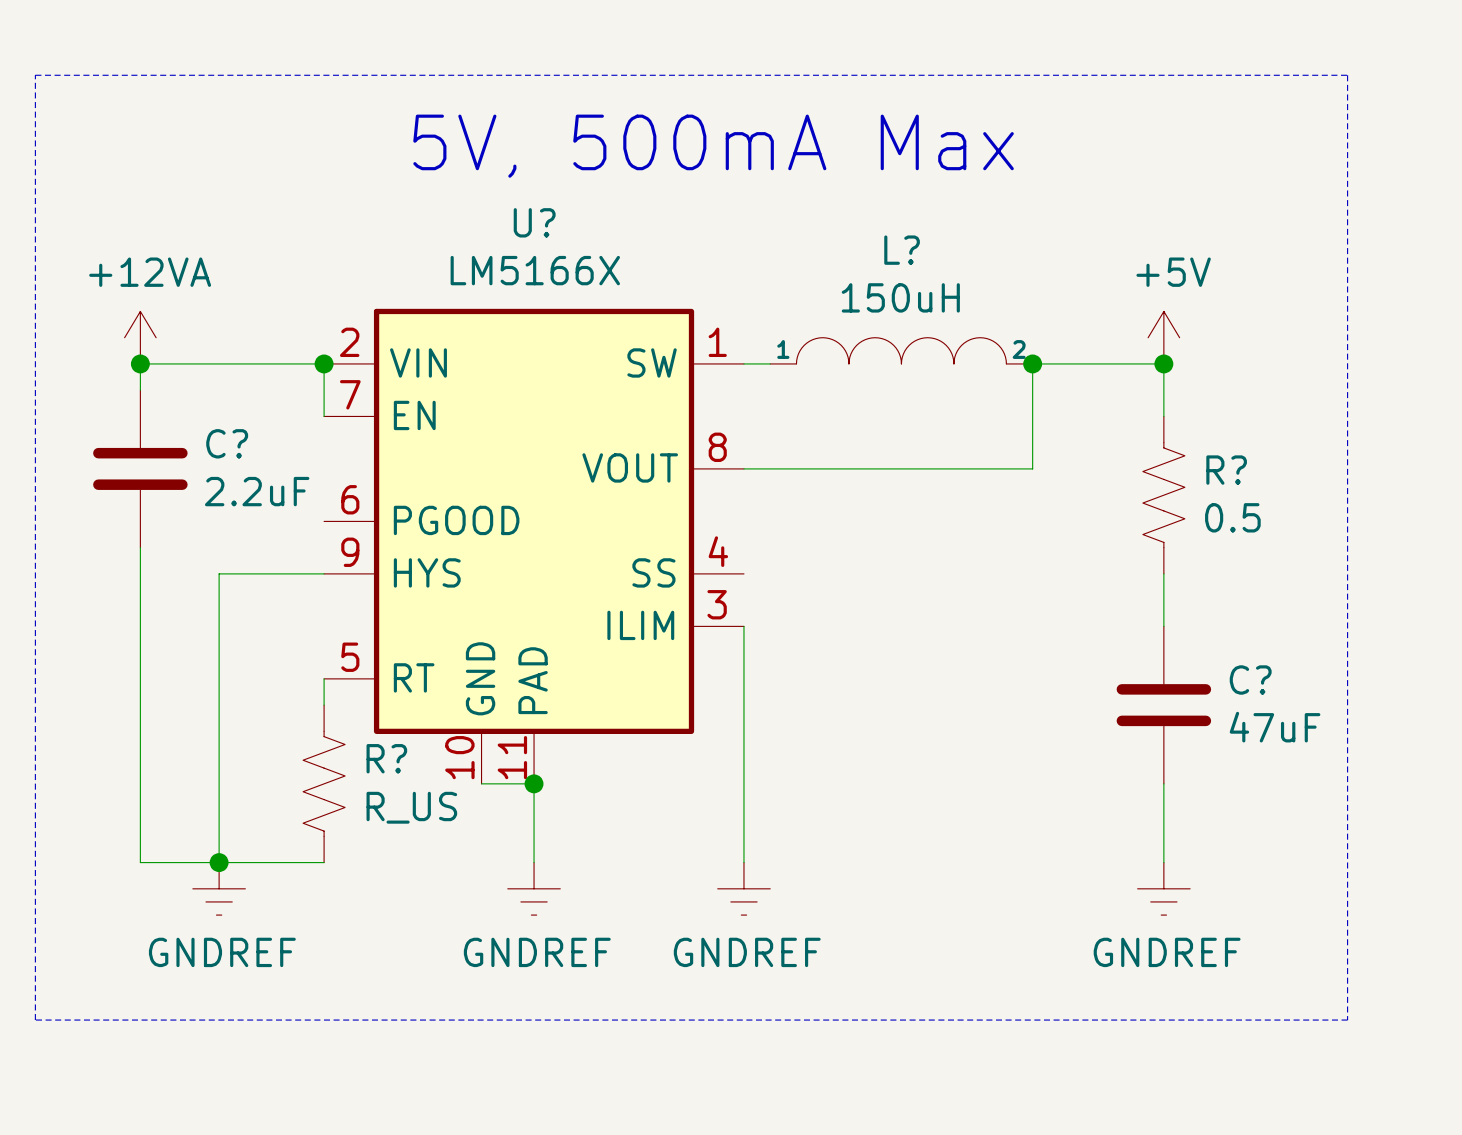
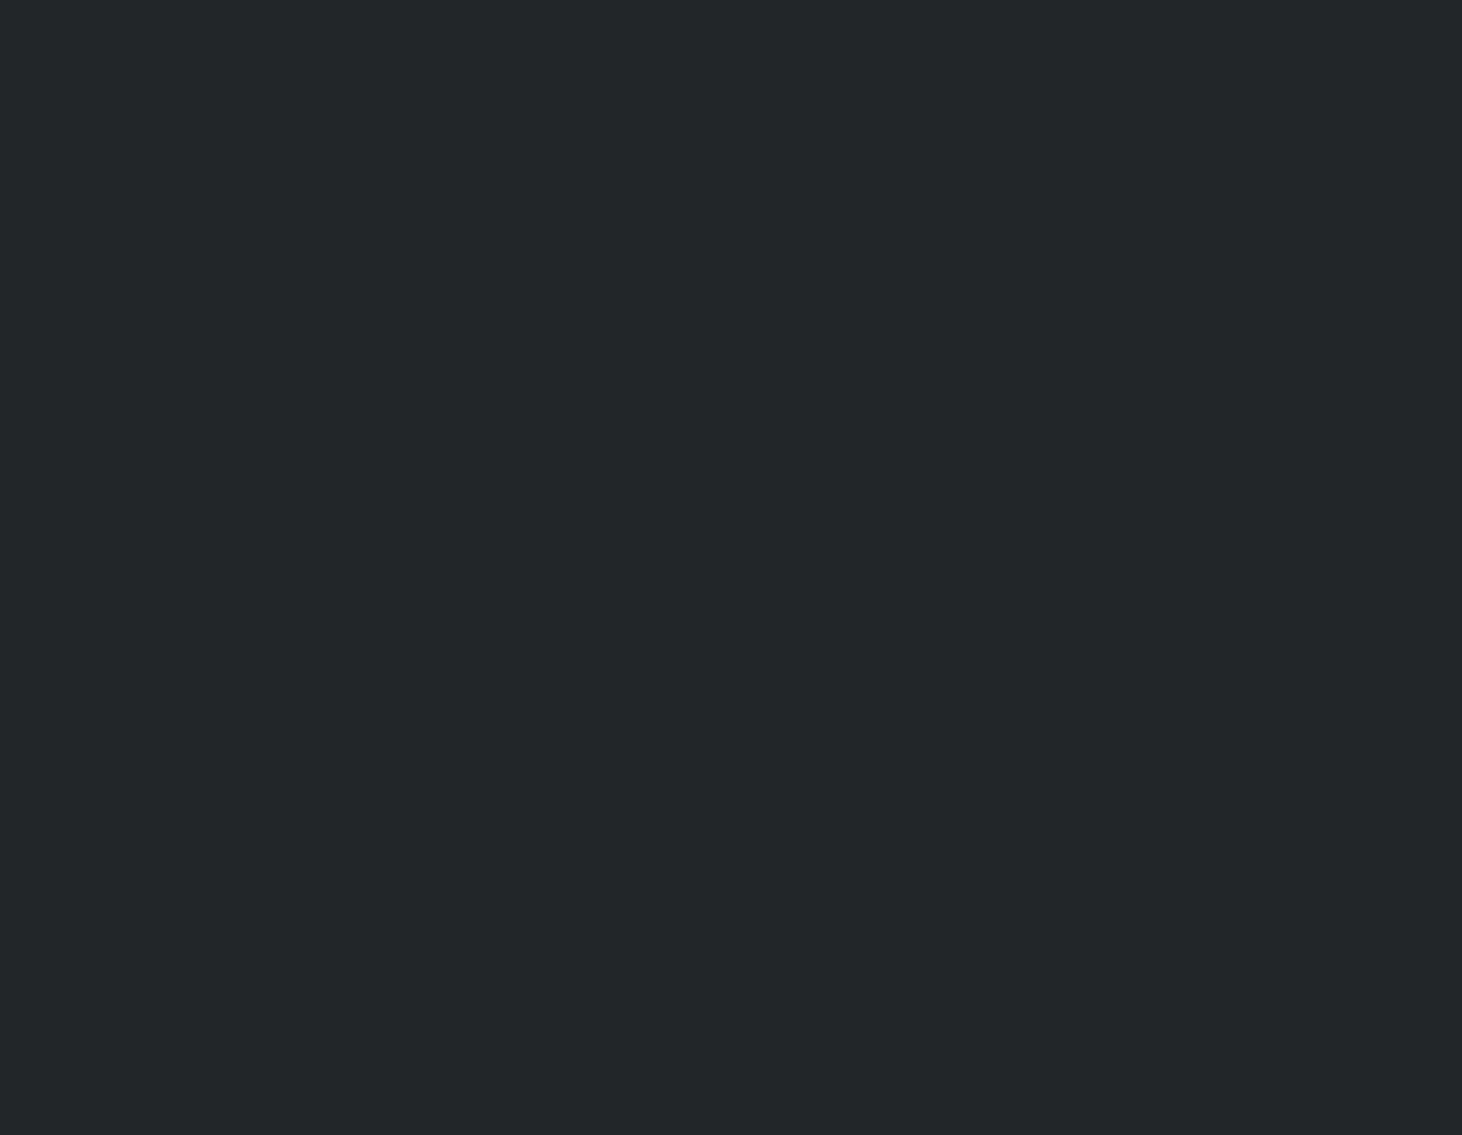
line: (35, 75) (35, 1020) (1347, 1020) (1347, 75) (35, 75) -> none
text: 5V, 500mA Max (713, 146) -> none
power symbol: +12VA (140, 337) -> none
power symbol: +5V (1163, 337) -> none
L?: 150uH (901, 350) -> none
junction: (140, 363) -> none
junction: (324, 363) -> none
wire: (743, 363) (770, 363) -> none
junction: (1032, 363) -> none
junction: (1163, 363) -> none
wire: (140, 390) (140, 363) (324, 363) (324, 416) -> none
wire: (1163, 416) (1163, 363) (1032, 363) (1032, 468) (743, 468) -> none
C?: 2.2uF (140, 468) -> none
R?: 0.5 (1163, 495) -> none
U?: LM5166X (534, 546) -> none
wire: (140, 547) (140, 862) (324, 862) -> none
wire: (324, 573) (219, 573) (219, 862) -> none
wire: (1163, 573) (1163, 626) -> none
wire: (743, 626) (743, 862) -> none
wire: (324, 678) (324, 705) -> none
C?: 47uF (1163, 705) -> none
R?: R_US (324, 783) -> none
wire: (481, 783) (534, 783) (534, 862) -> none
junction: (534, 783) -> none
wire: (1163, 783) (1163, 862) -> none
junction: (219, 862) -> none
power symbol: GNDREF (219, 888) -> none
power symbol: GNDREF (534, 888) -> none
power symbol: GNDREF (743, 888) -> none
power symbol: GNDREF (1163, 888) -> none

